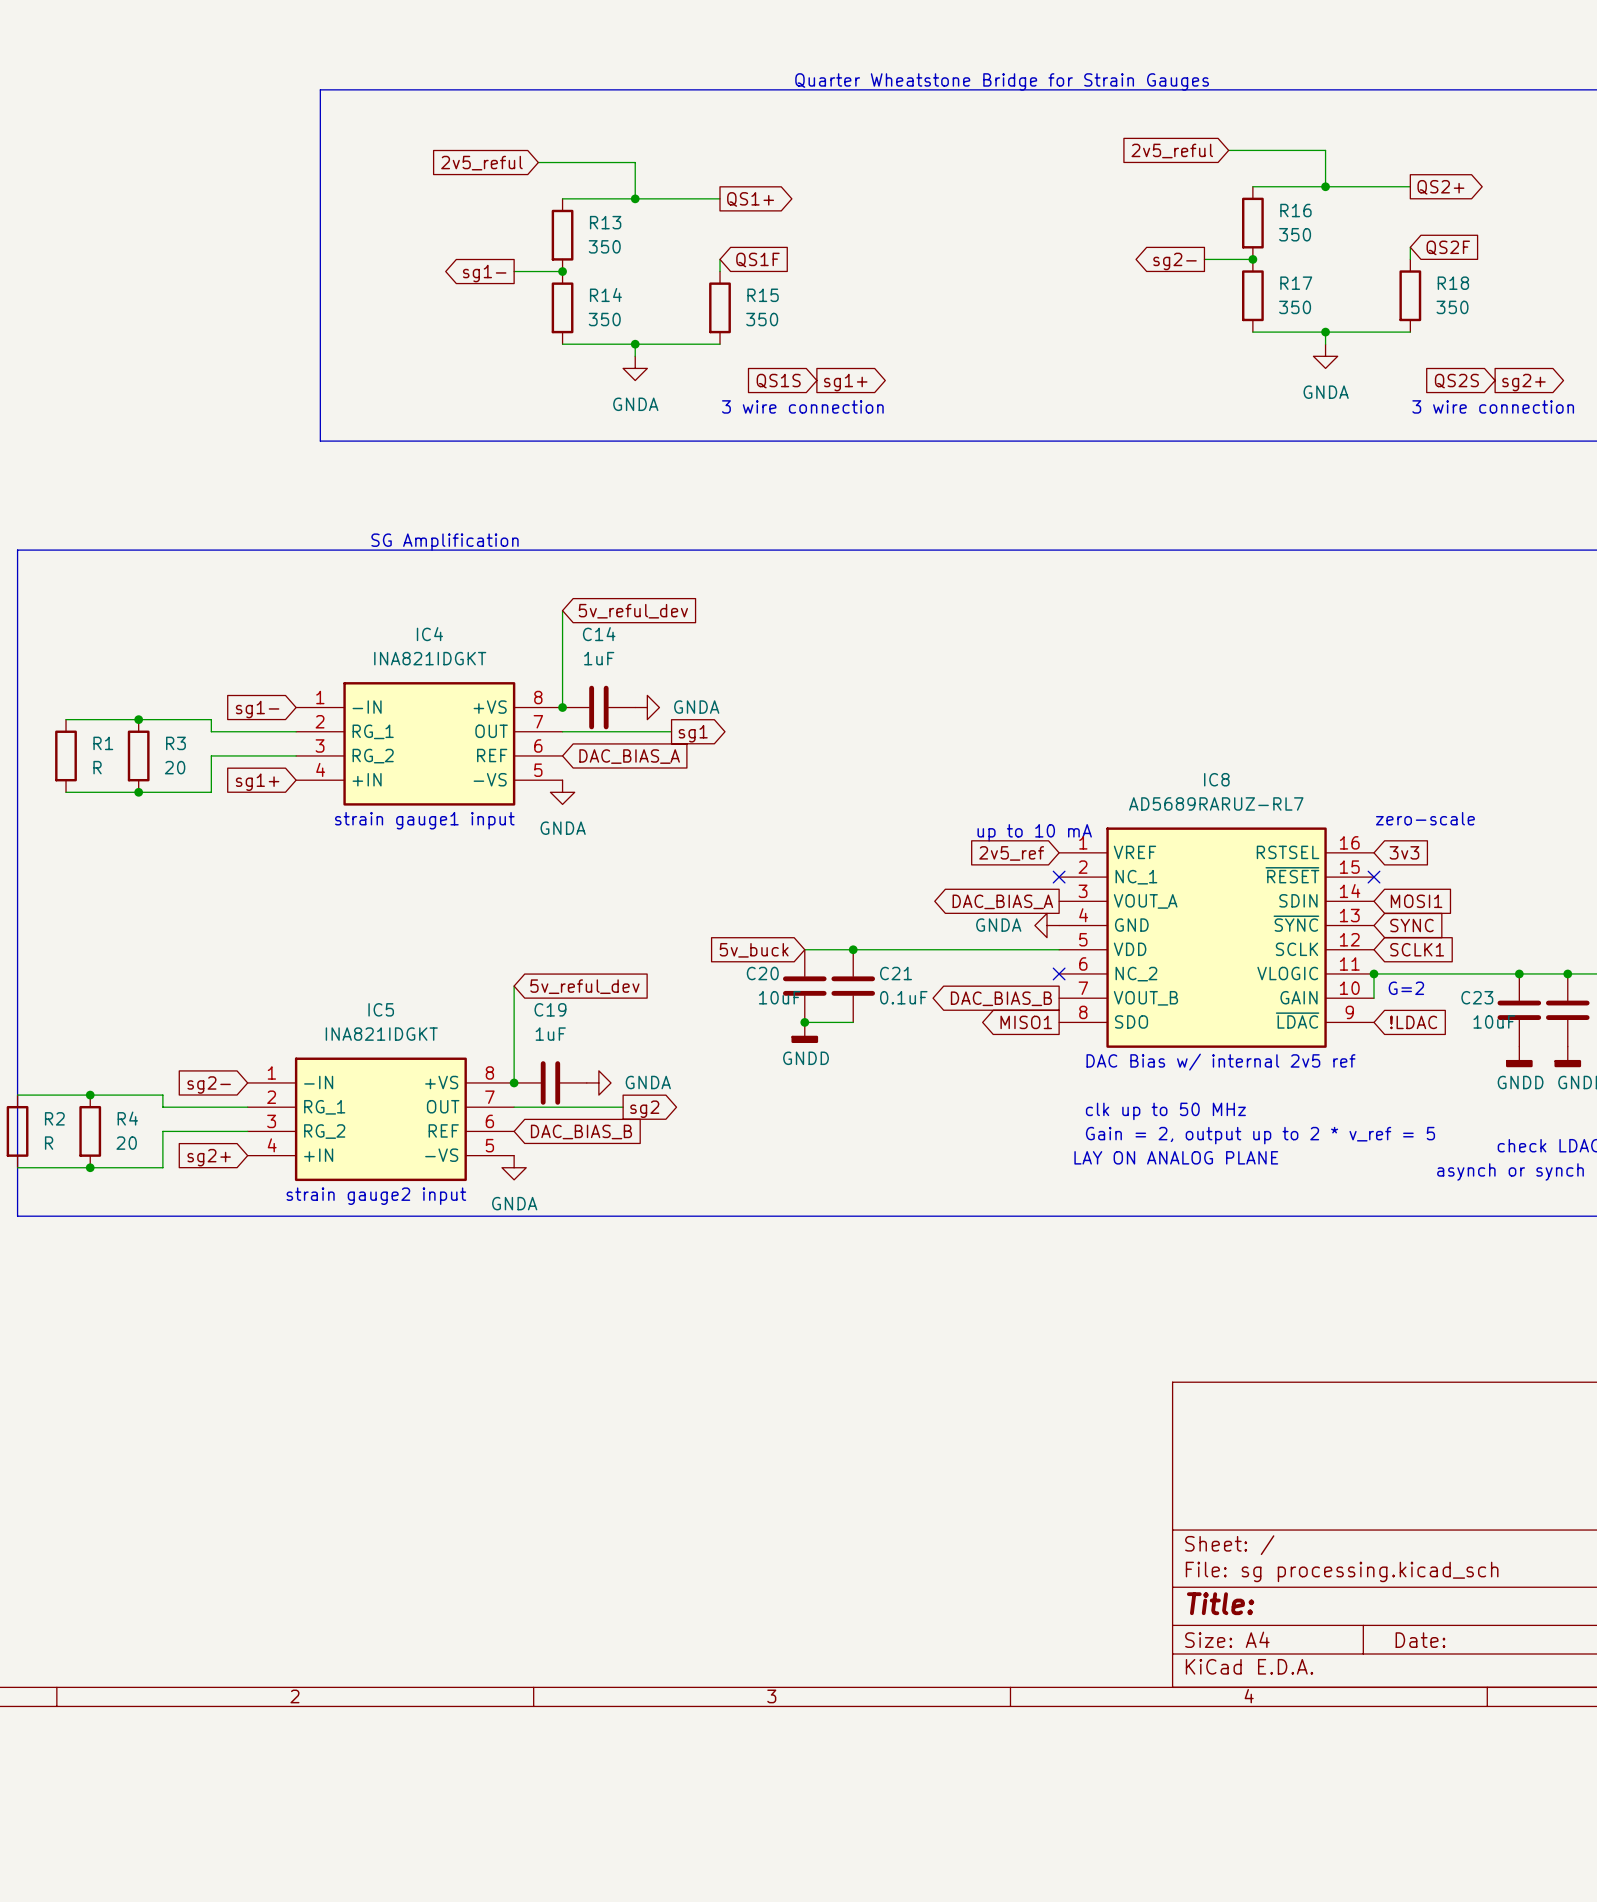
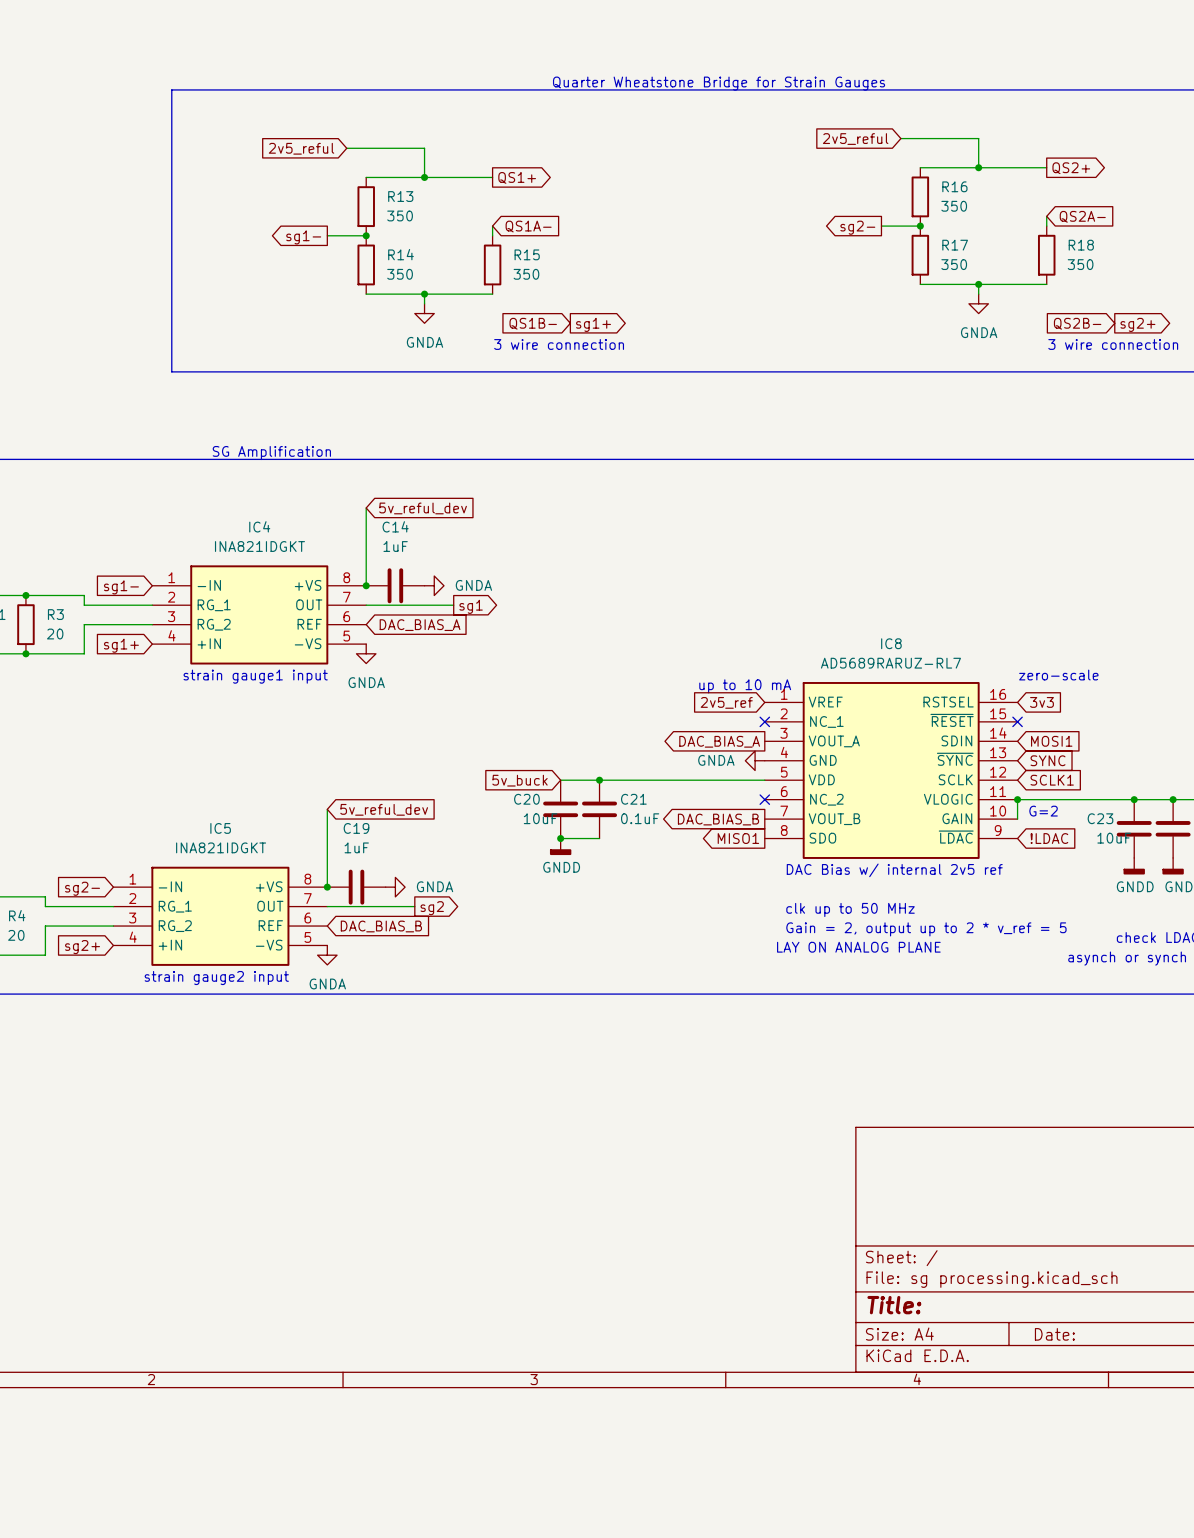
global label: QS2F (1448, 247) -> QS2A- (1082, 216)
global label: QS1F (757, 259) -> QS1A- (528, 226)
global label: QS1S (778, 381) -> QS1B- (533, 323)
global label: QS2S (1456, 381) -> QS2B- (1077, 323)

